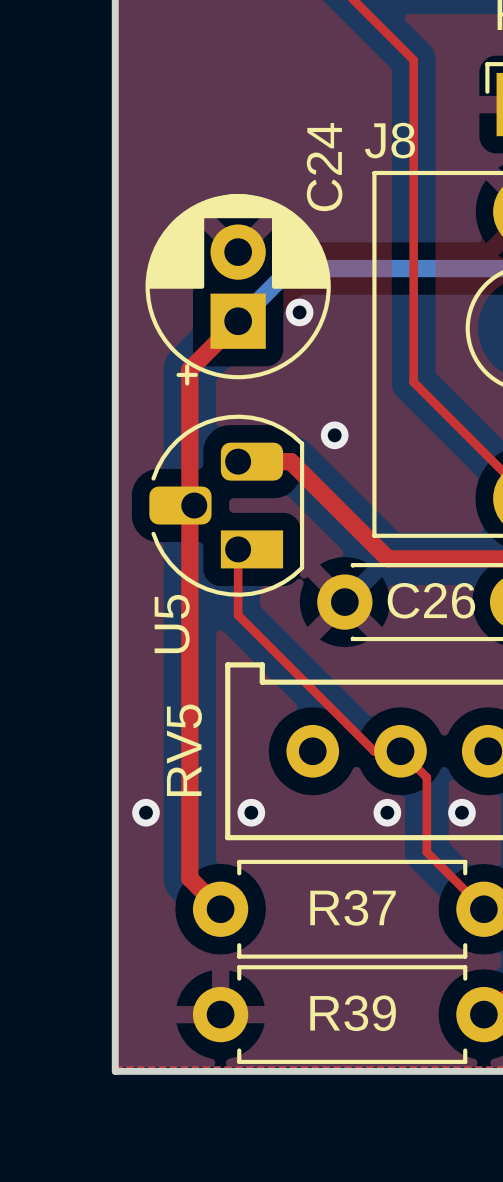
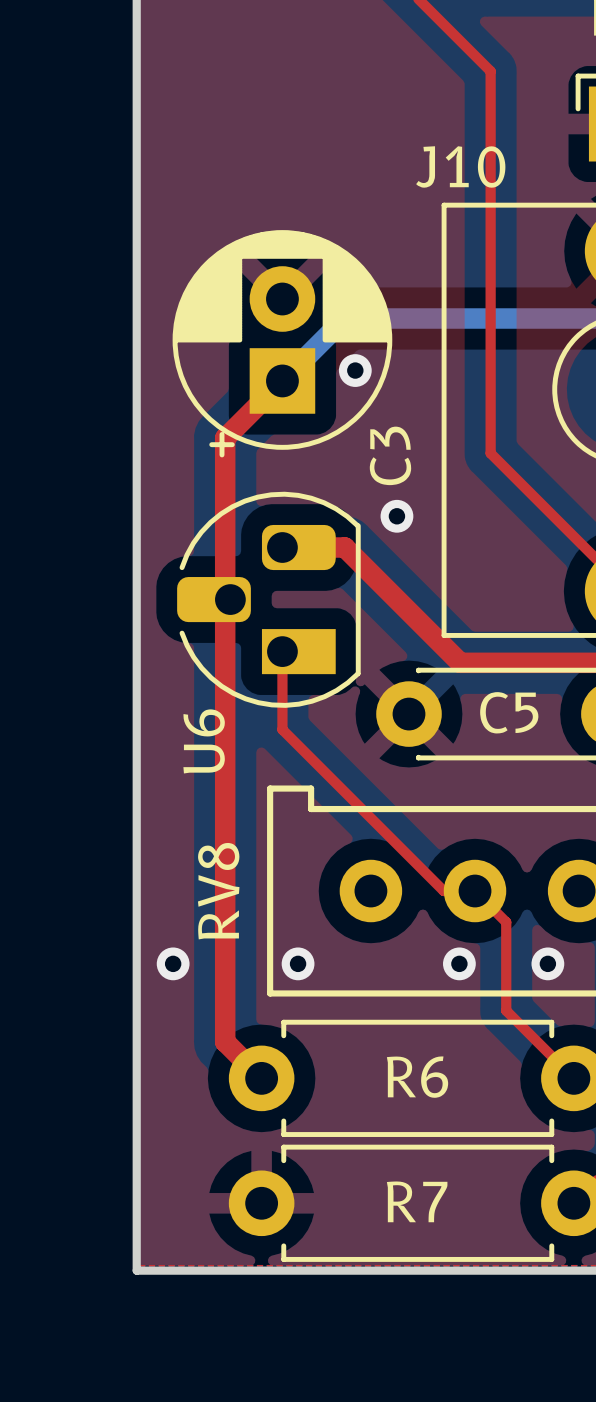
J8 name: J8 (389, 140) -> J10 (460, 166)
C24 name: C24 (324, 167) -> C3 (390, 455)
C26 name: C26 (431, 600) -> C5 (509, 712)
U5 name: U5 (172, 624) -> U6 (204, 741)
RV5 name: RV5 (184, 750) -> RV8 (218, 891)
R37 name: R37 (353, 907) -> R6 (417, 1077)
R39 name: R39 (353, 1013) -> R7 (417, 1201)

